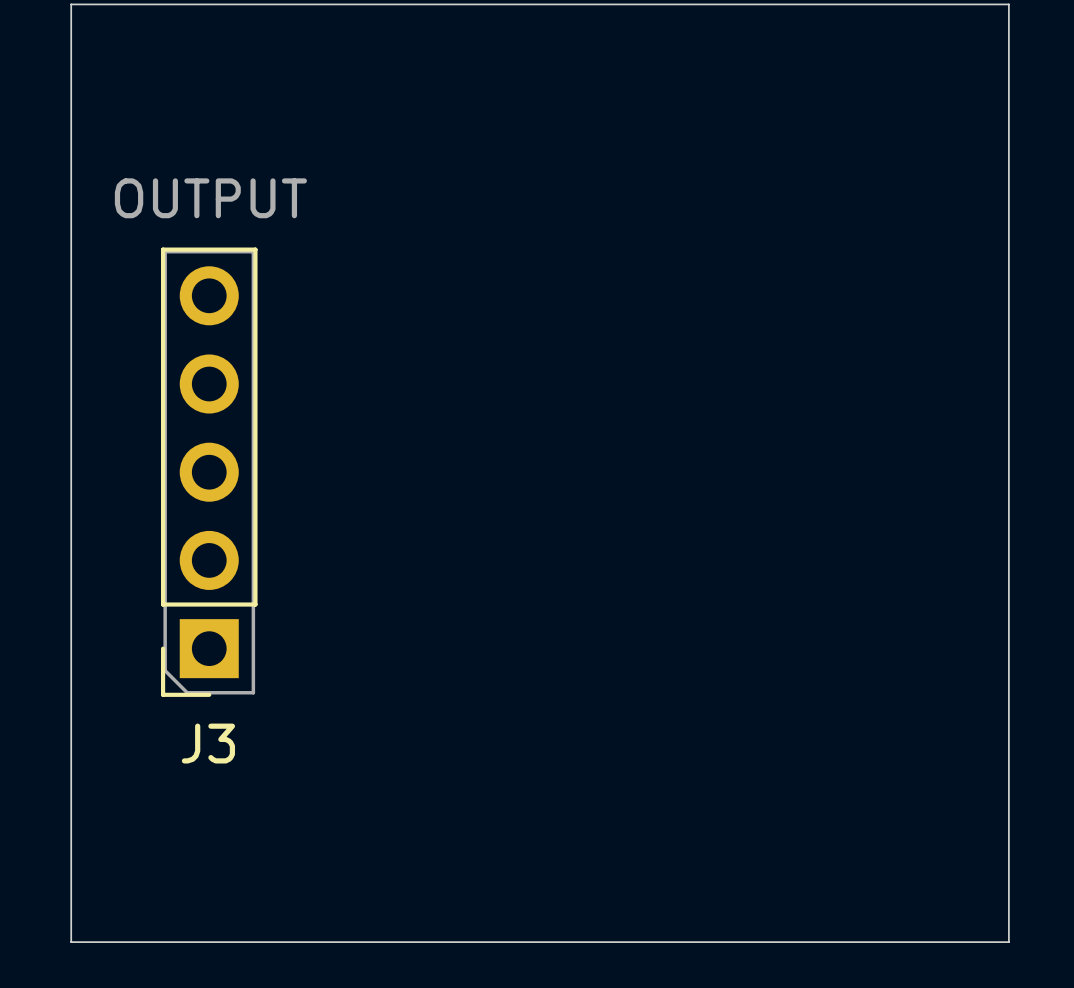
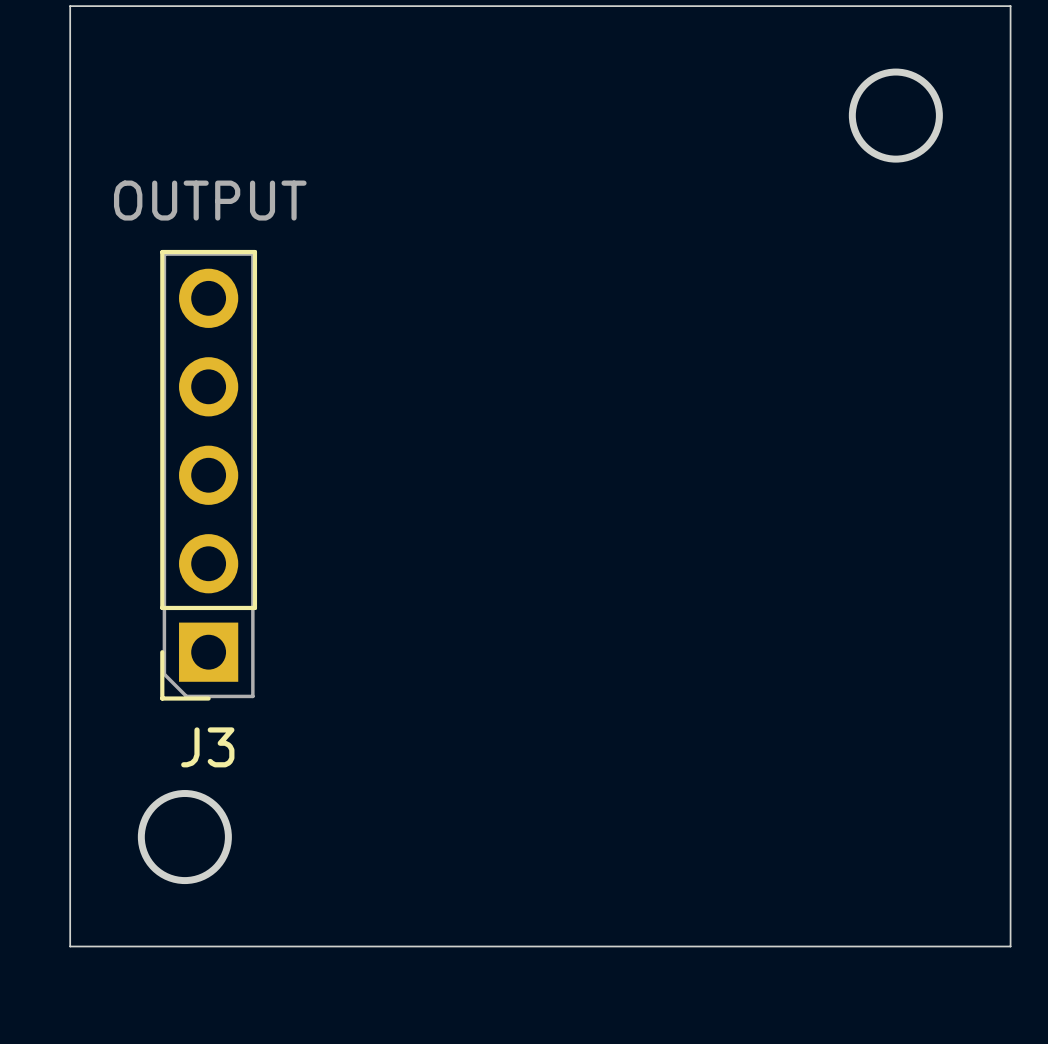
round board edge: none -> [848, 68, 943, 163]
round board edge: none -> [137, 790, 232, 885]

